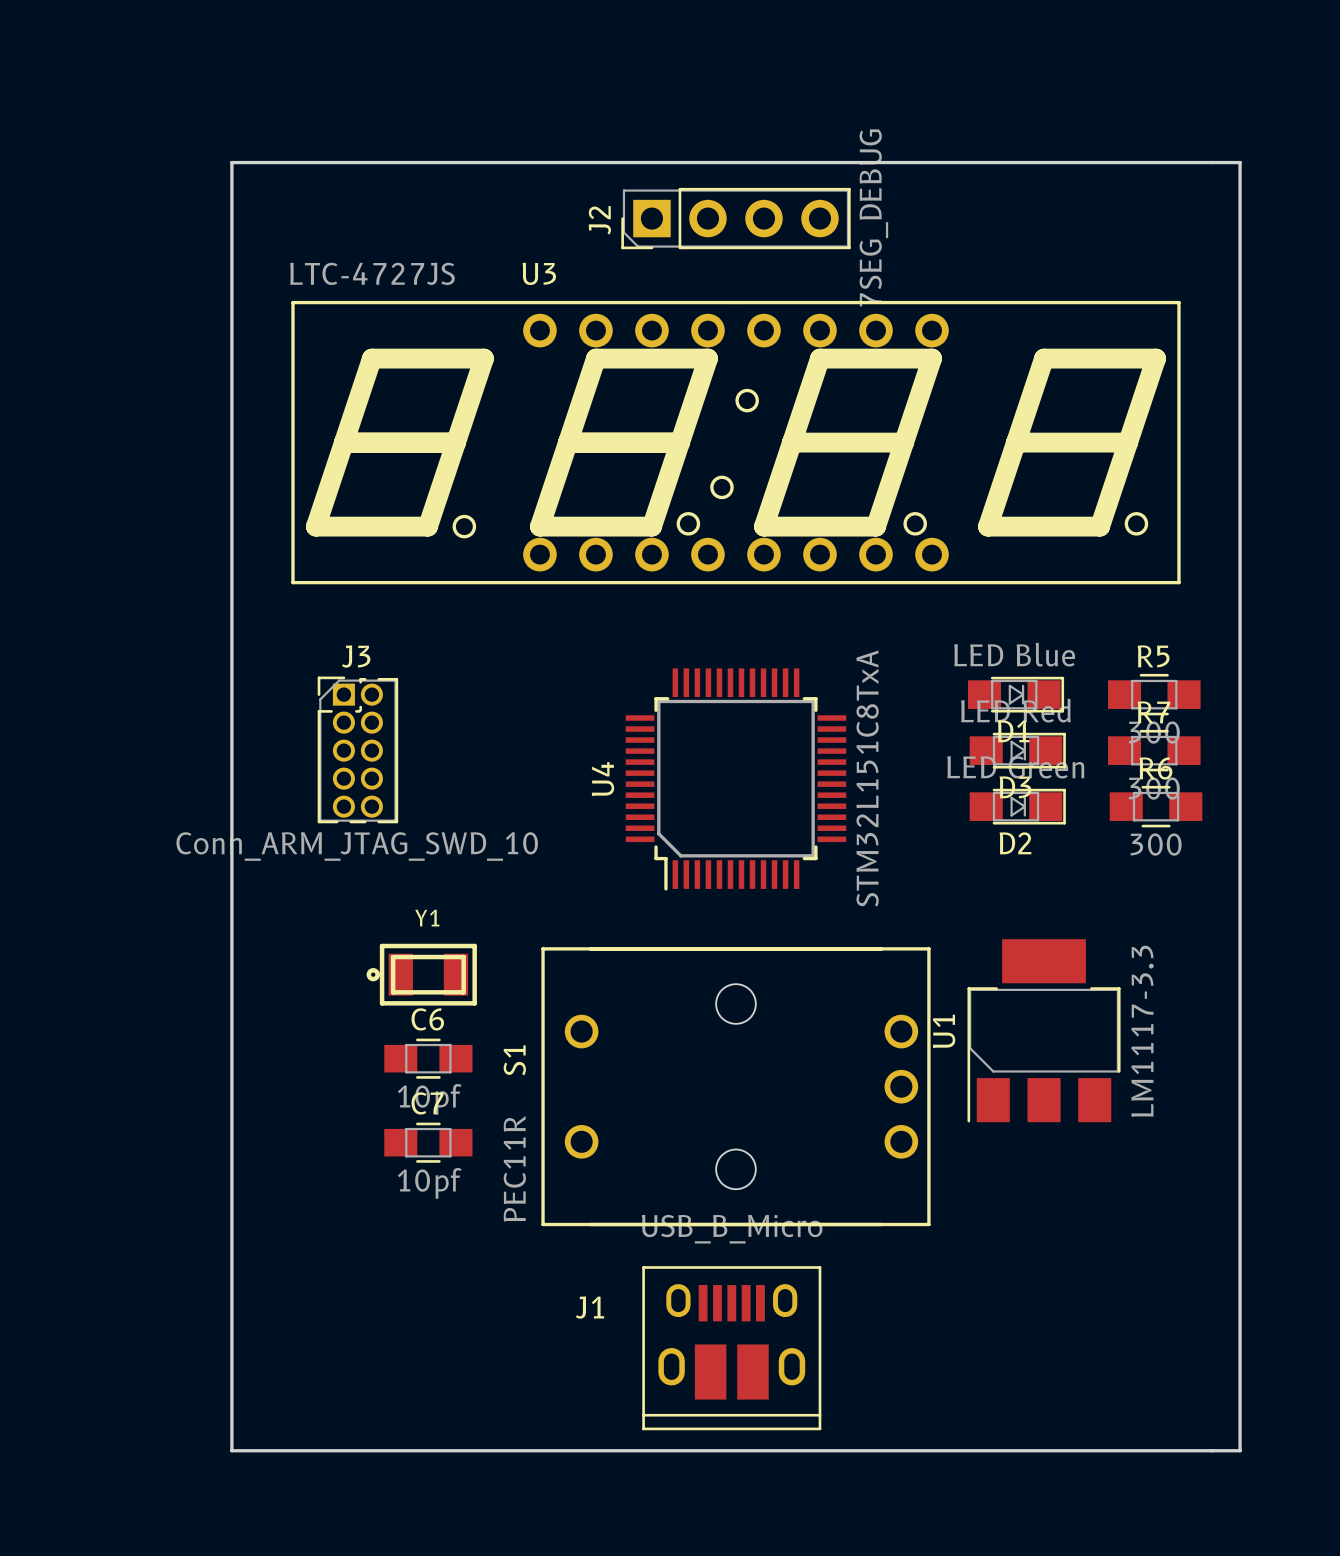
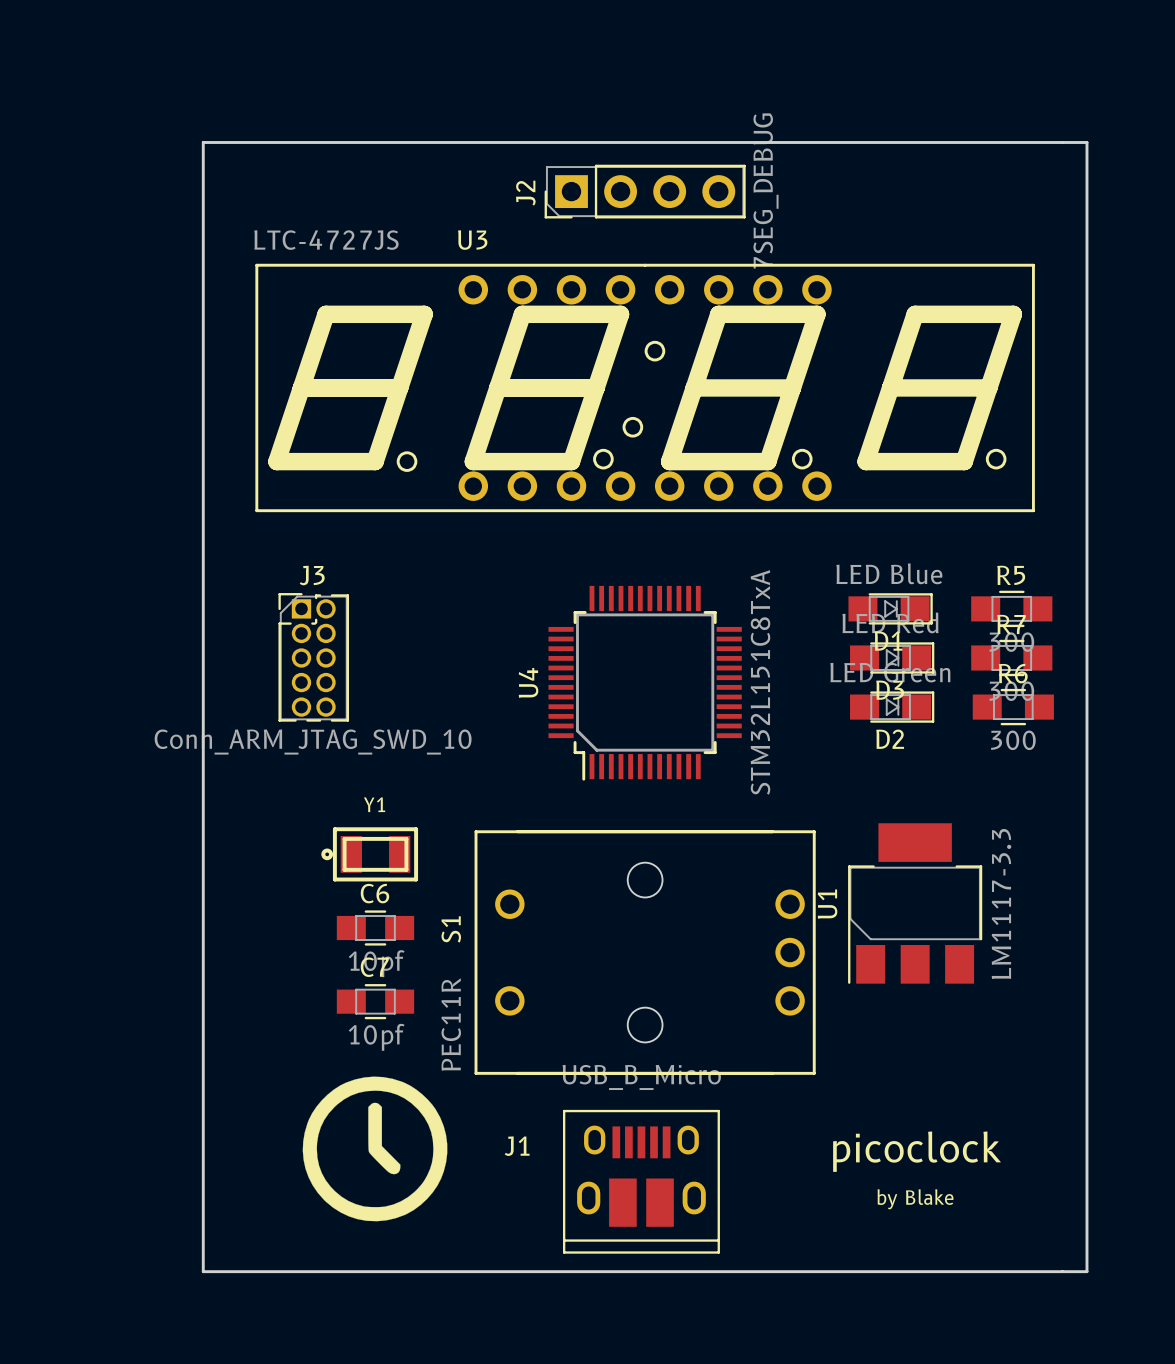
drawing: none -> [302, 1076, 448, 1222]
text: none -> picoclock (917, 1151)
text: none -> by Blake (915, 1199)

